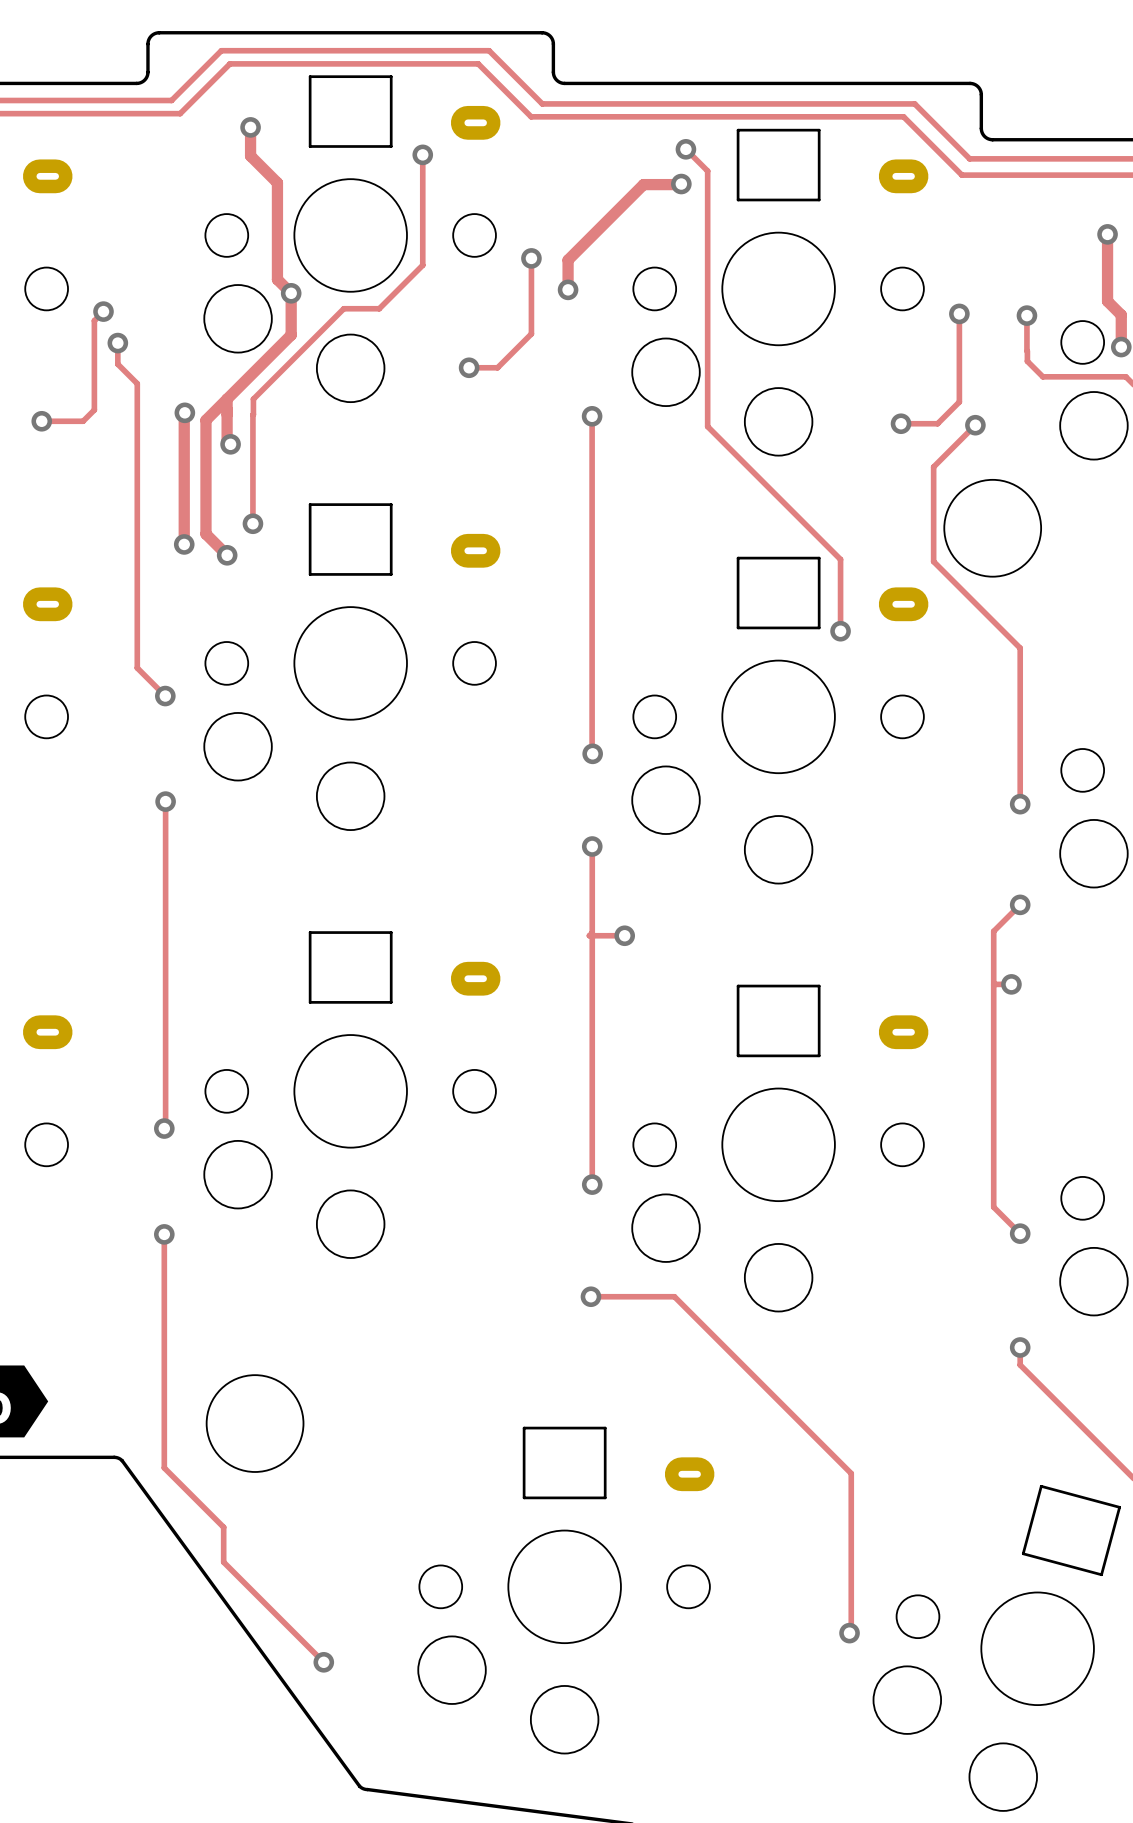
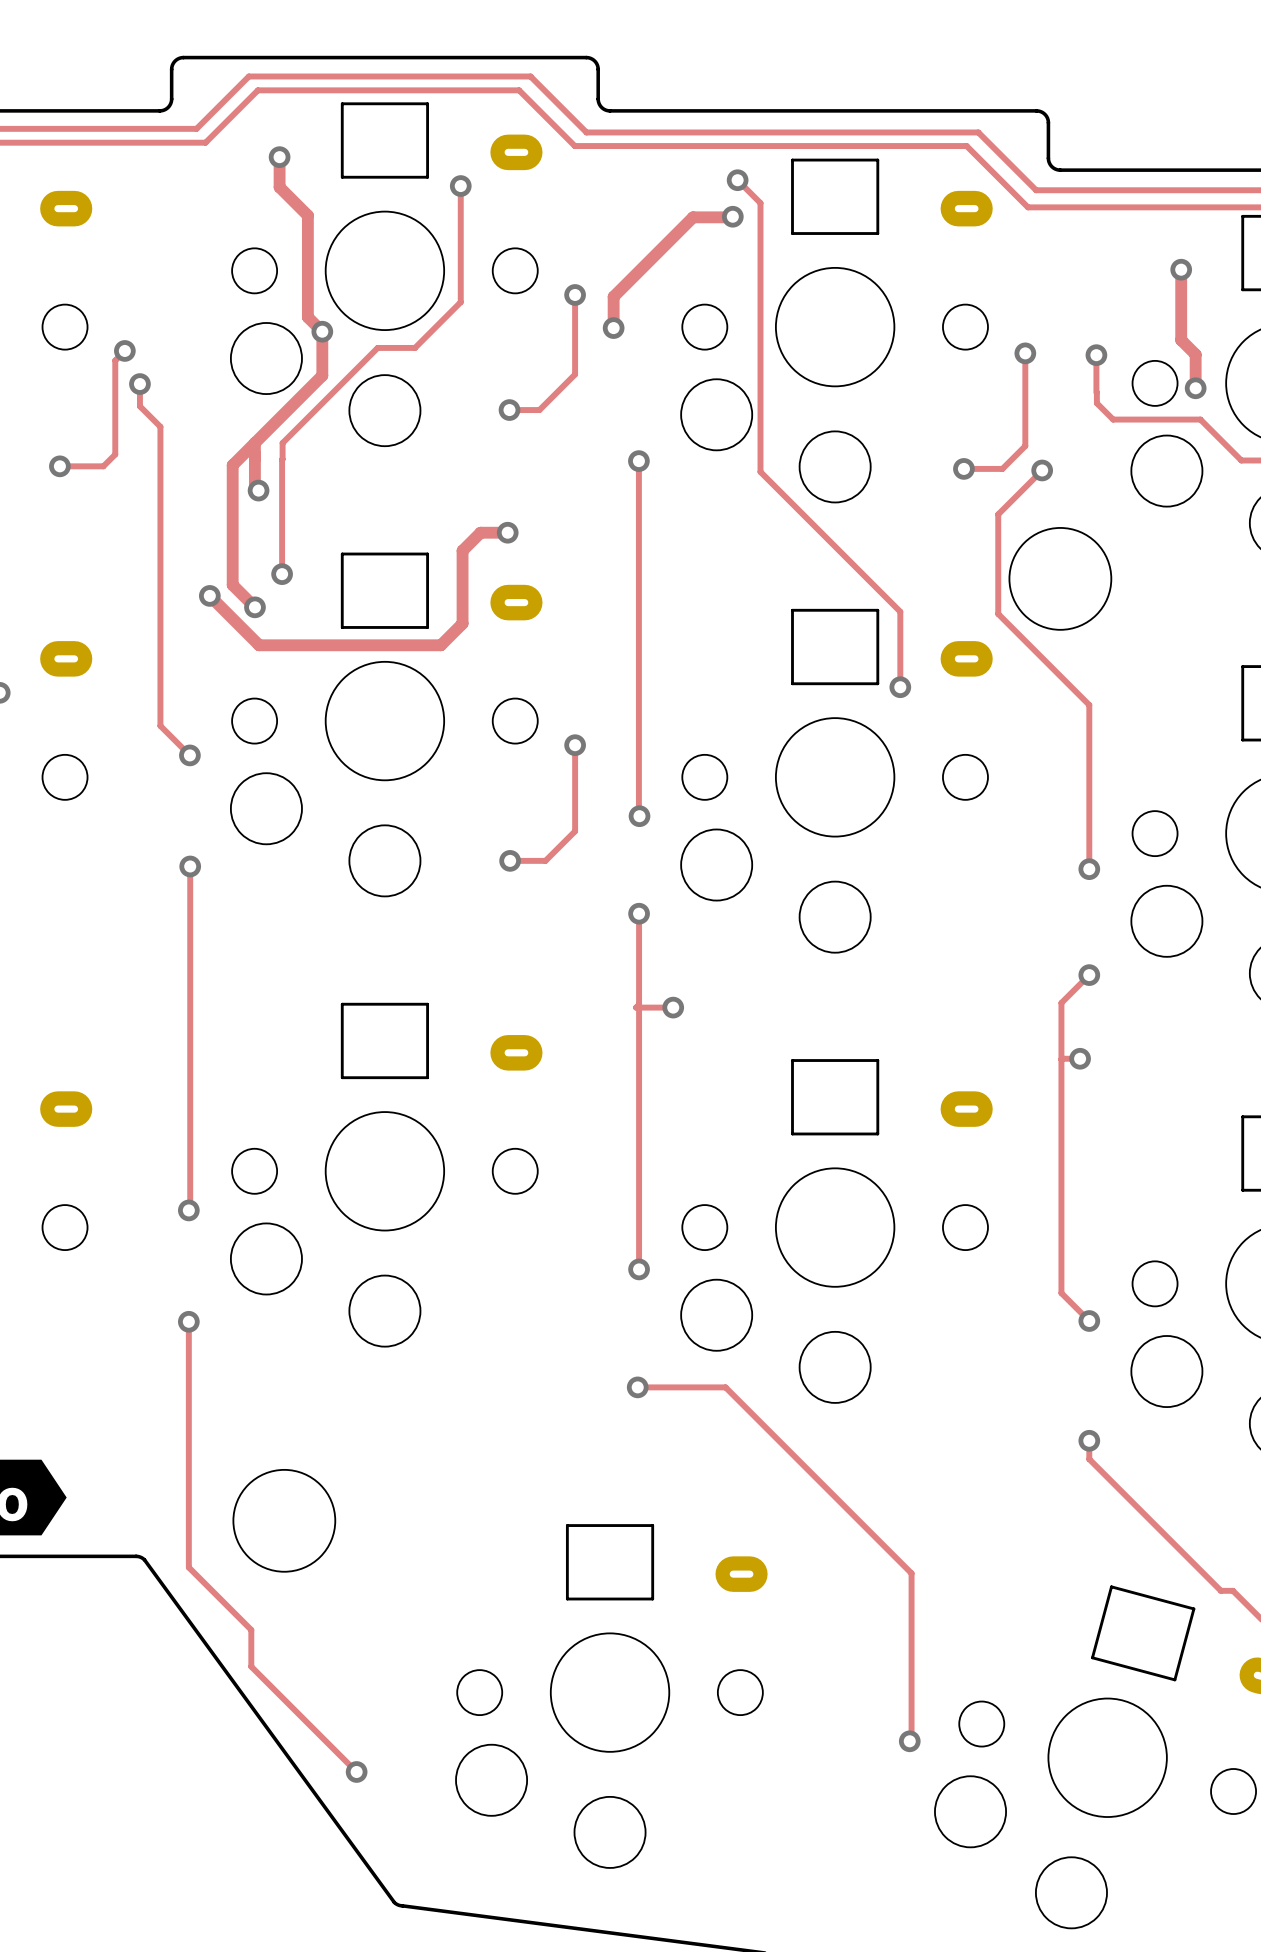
track: (184, 412) (184, 544) -> (507, 532) (480, 532) (462, 550) (462, 623) (440, 645) (259, 645) (209, 595)
via: (184, 412) -> none
via: none -> (507, 532)
track: none -> (575, 745) (575, 831) (545, 860) (510, 860)
via: none -> (575, 745)
via: none -> (510, 860)

